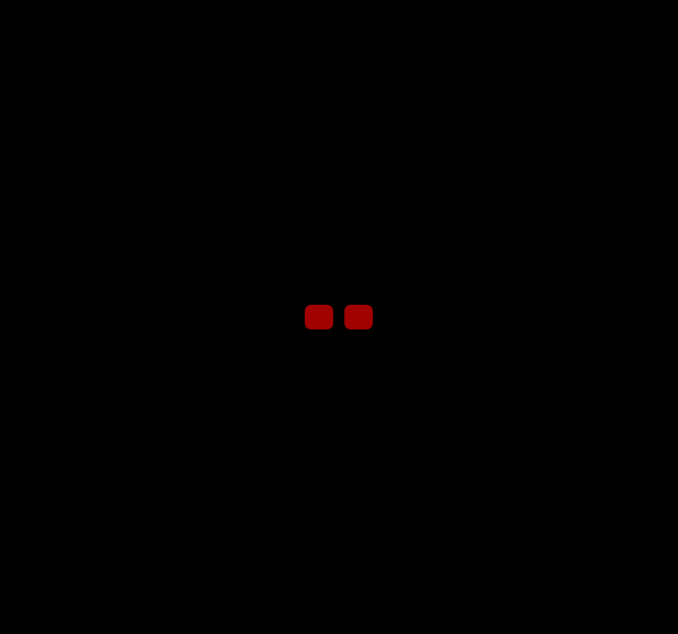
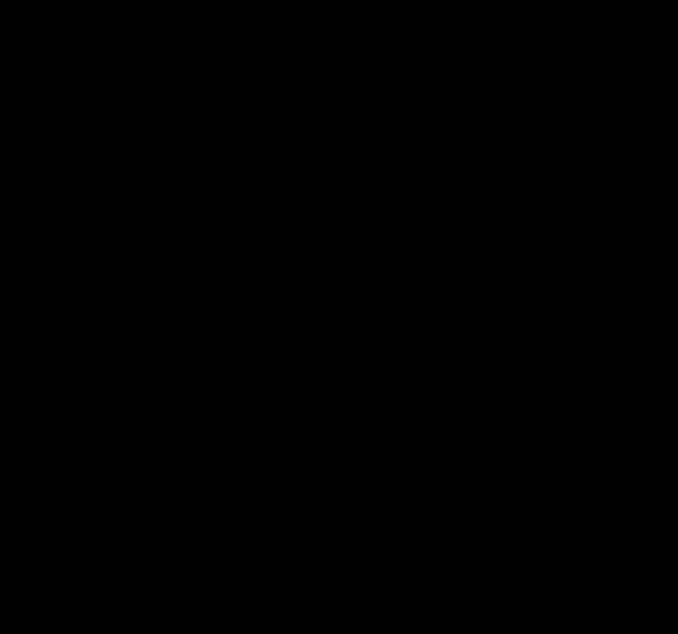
part: (338, 317) -> none

